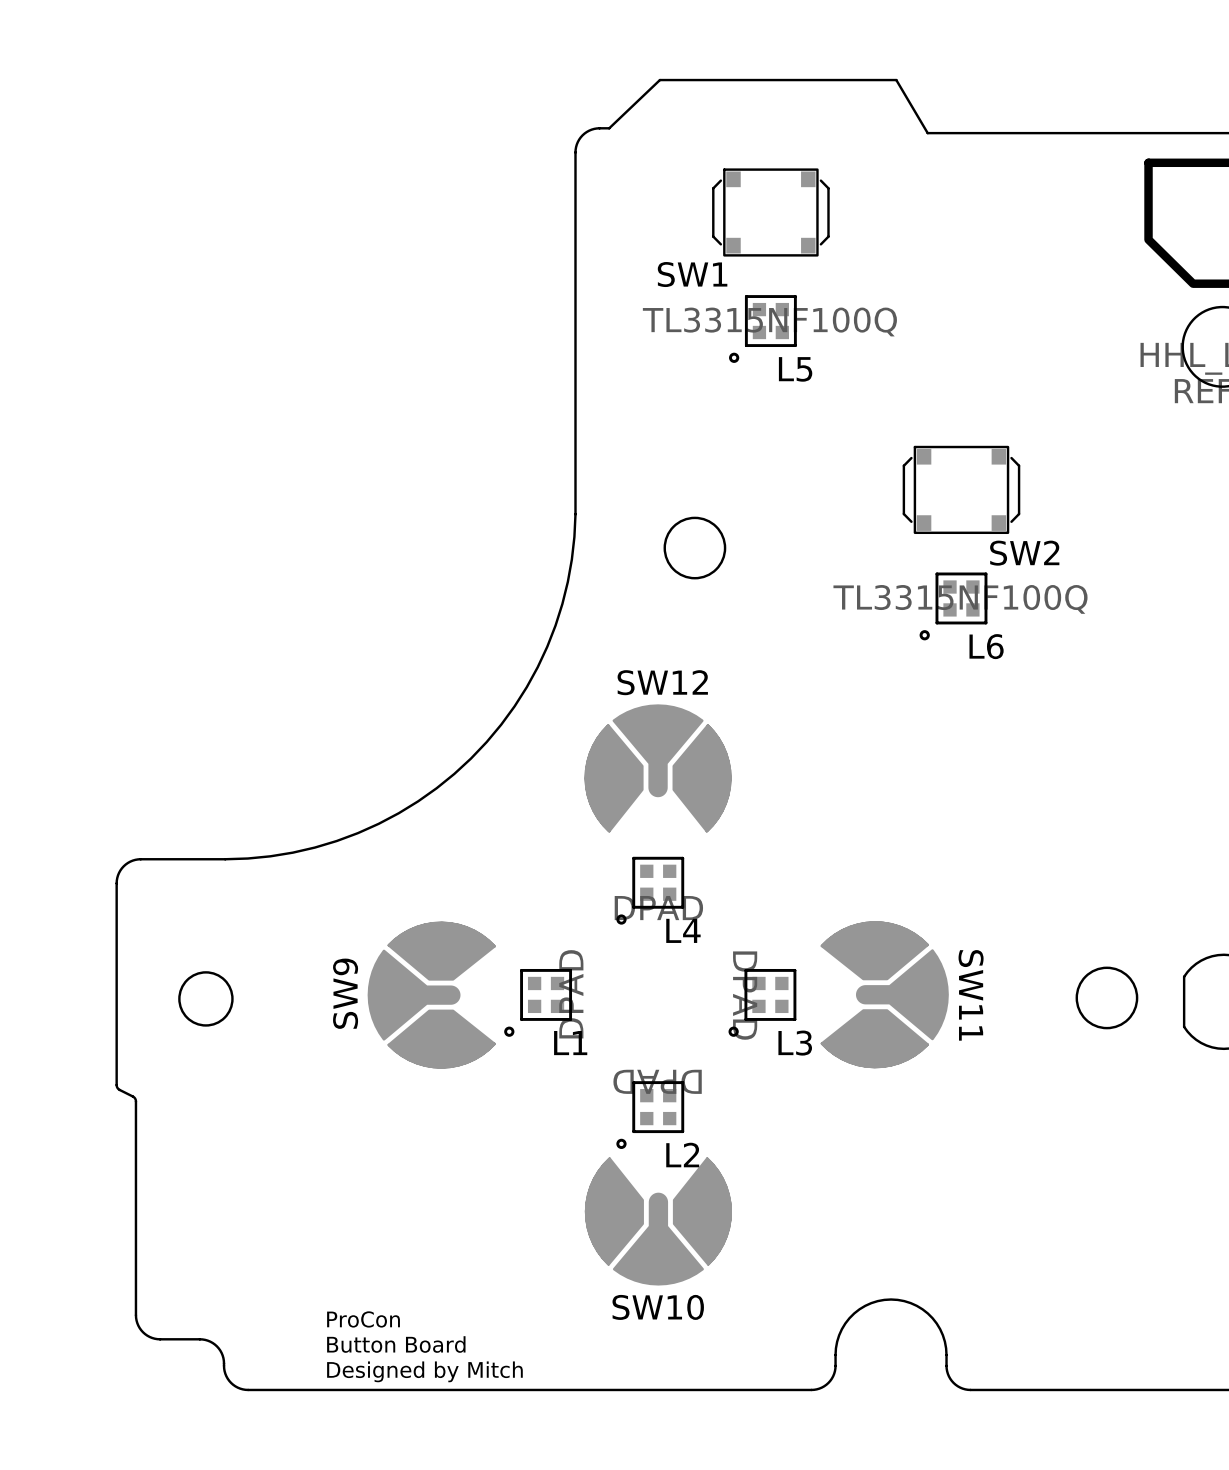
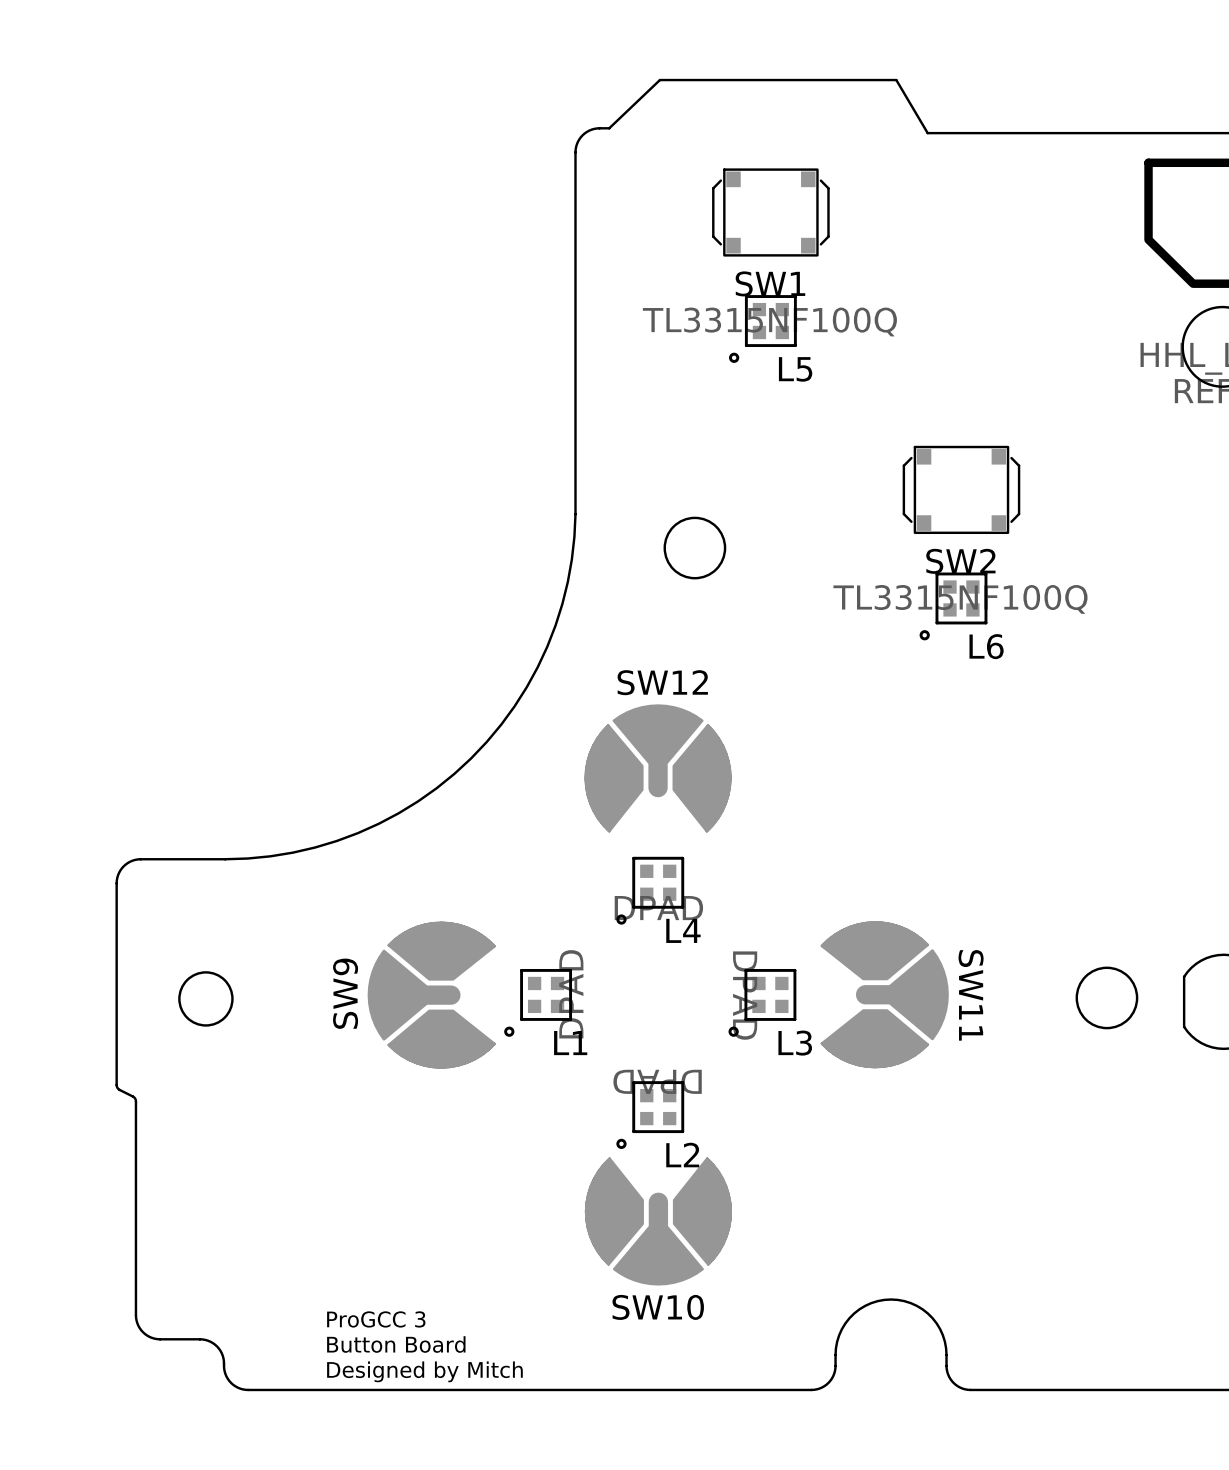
SW1 name position: SW1 (692, 274) -> SW1 (770, 283)
SW2 name position: SW2 (1024, 553) -> SW2 (960, 561)
text: ProCon (363, 1319) -> ProGCC 3 (376, 1319)

